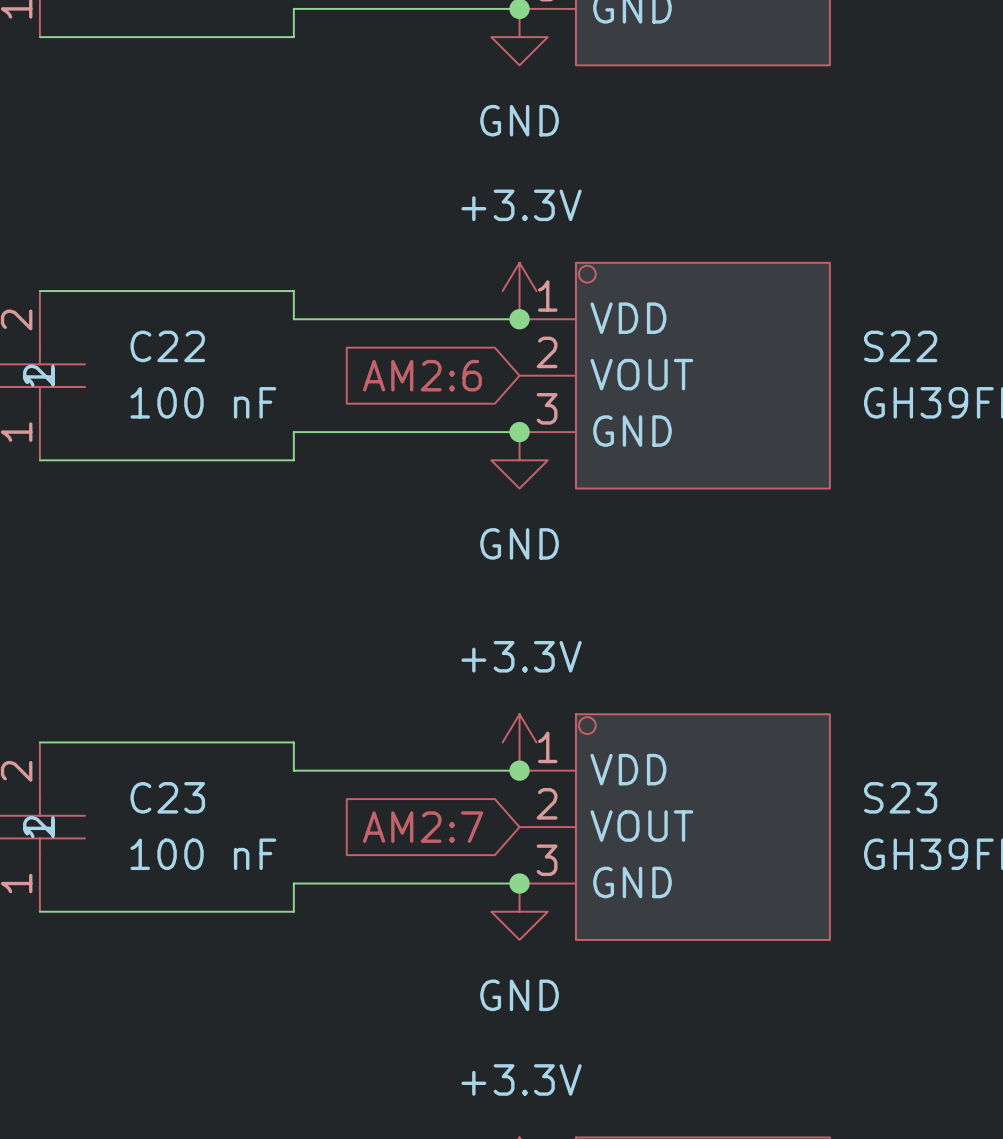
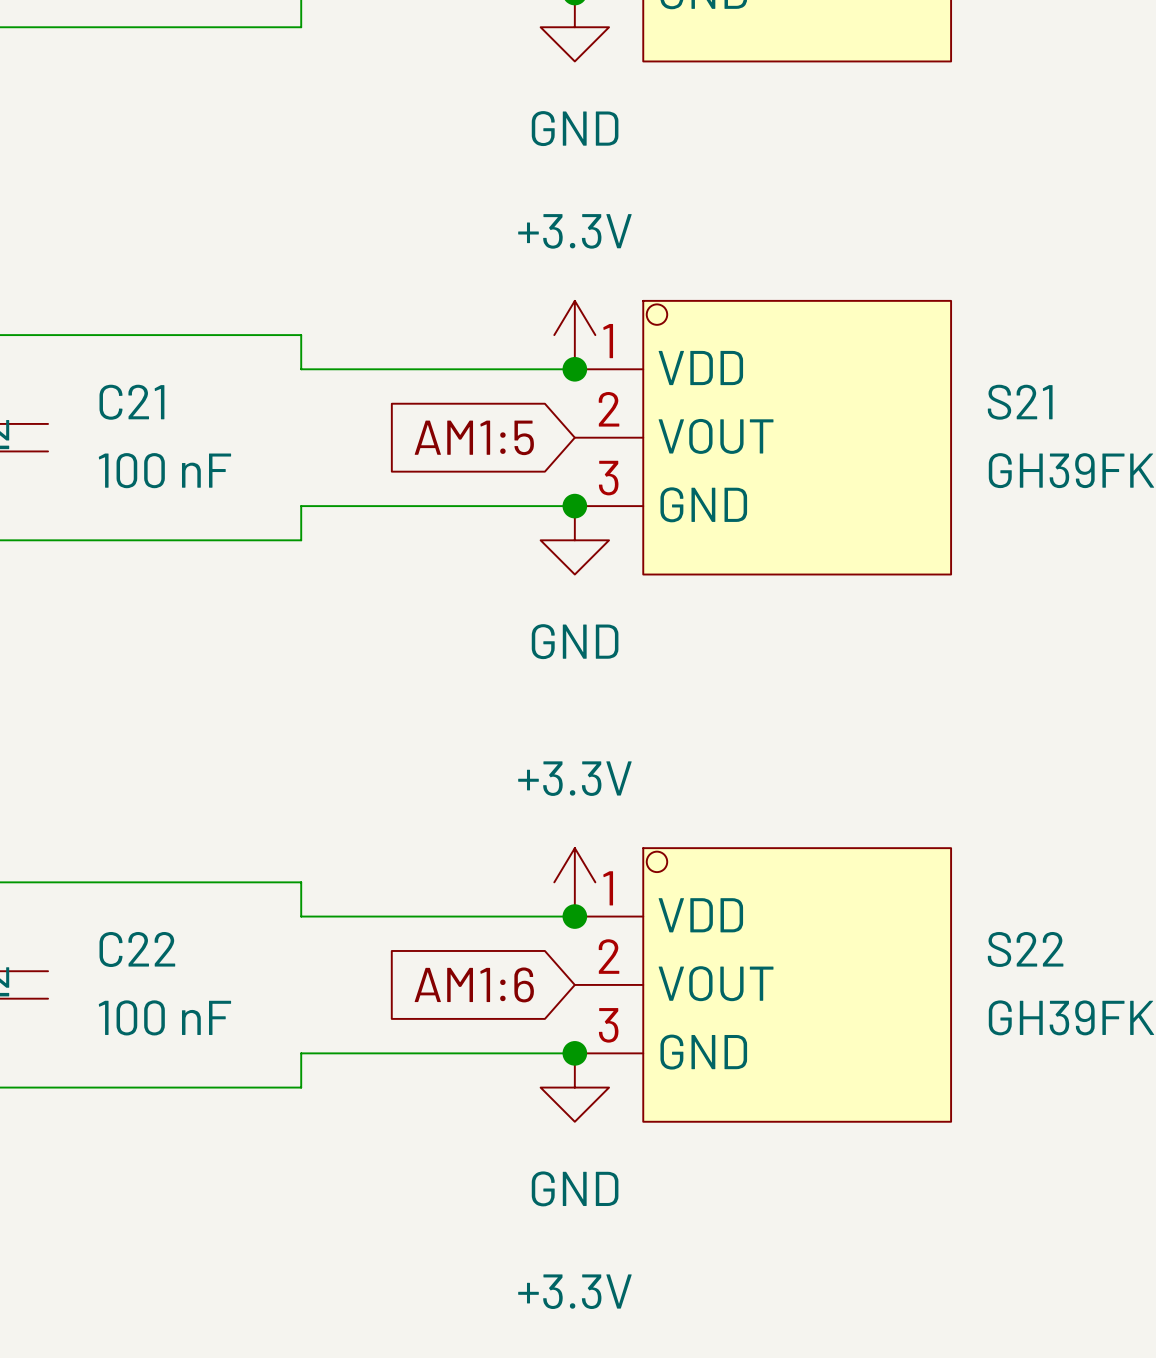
C22 name: C22 (167, 346) -> C21 (131, 402)
S22 name: S22 (900, 346) -> S21 (1020, 402)
global label: AM2:6 (422, 375) -> AM1:5 (474, 437)
C23 name: C23 (167, 797) -> C22 (137, 949)
S23 name: S23 (900, 797) -> S22 (1025, 949)
global label: AM2:7 (423, 827) -> AM1:6 (474, 984)

